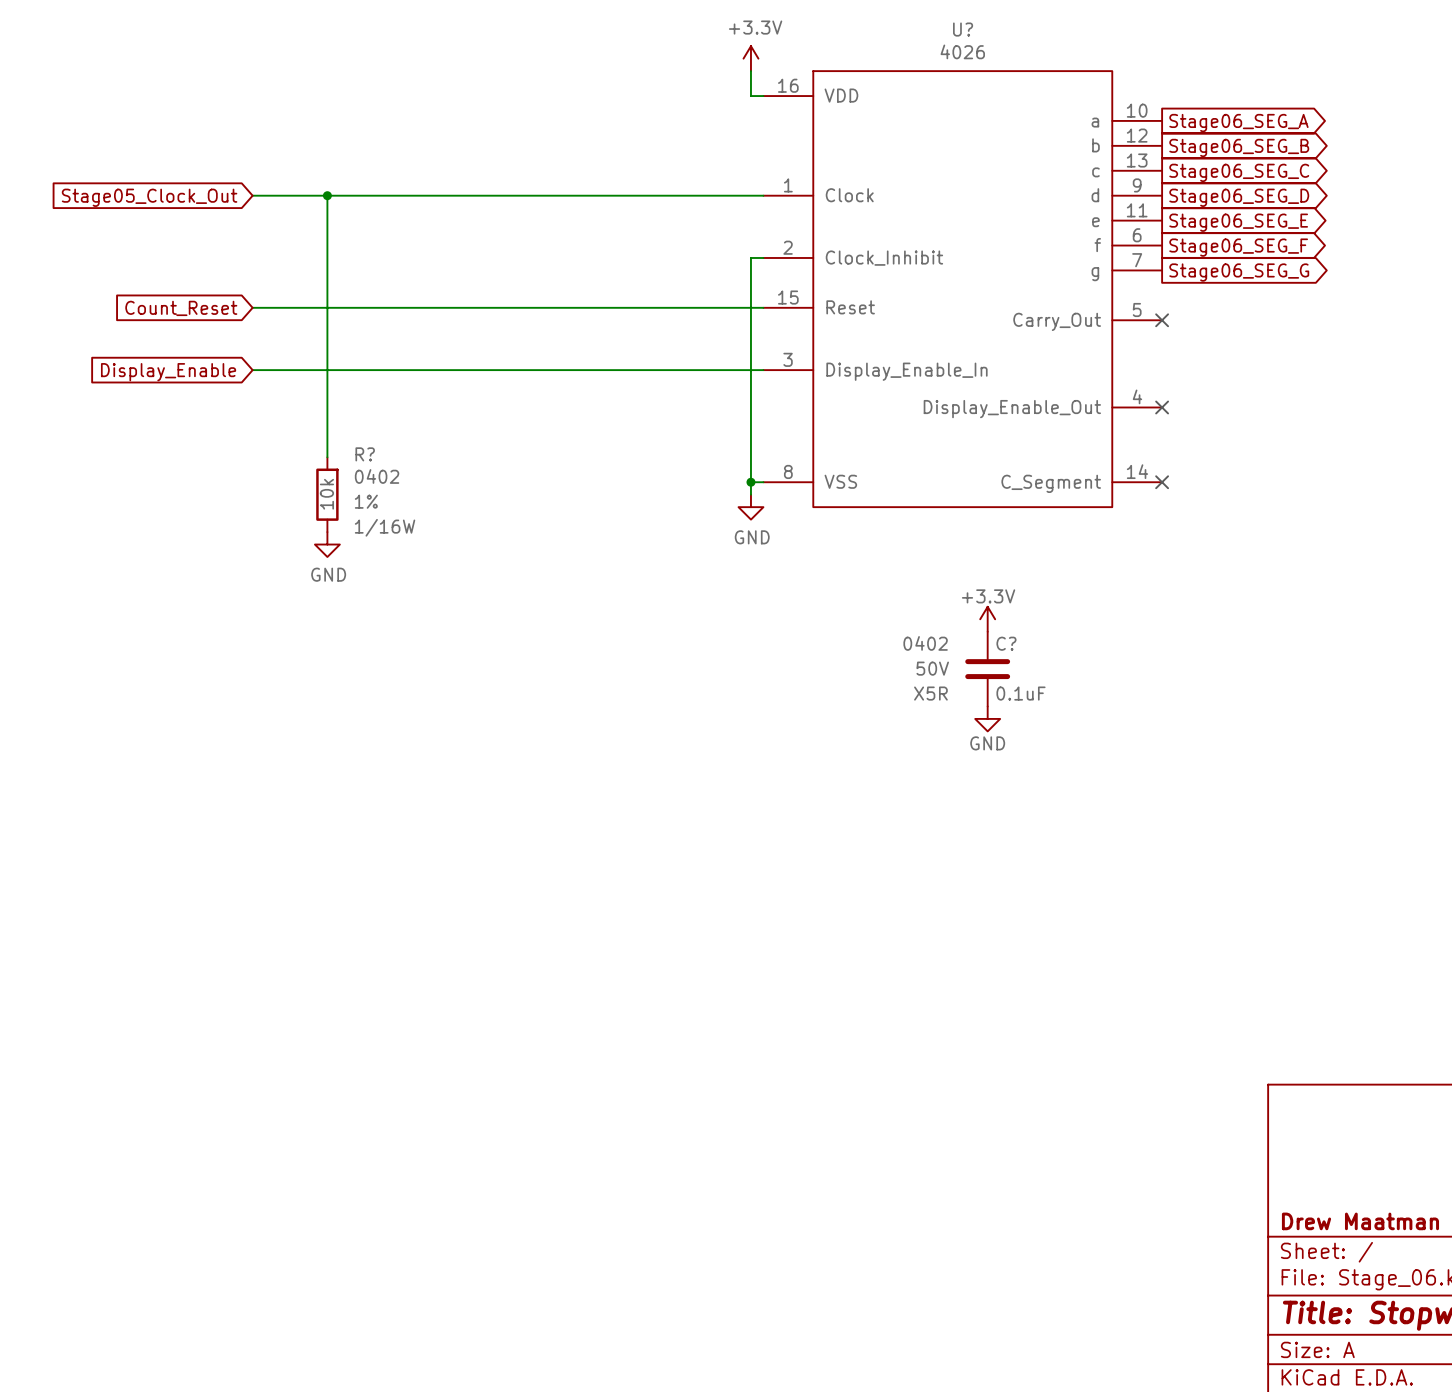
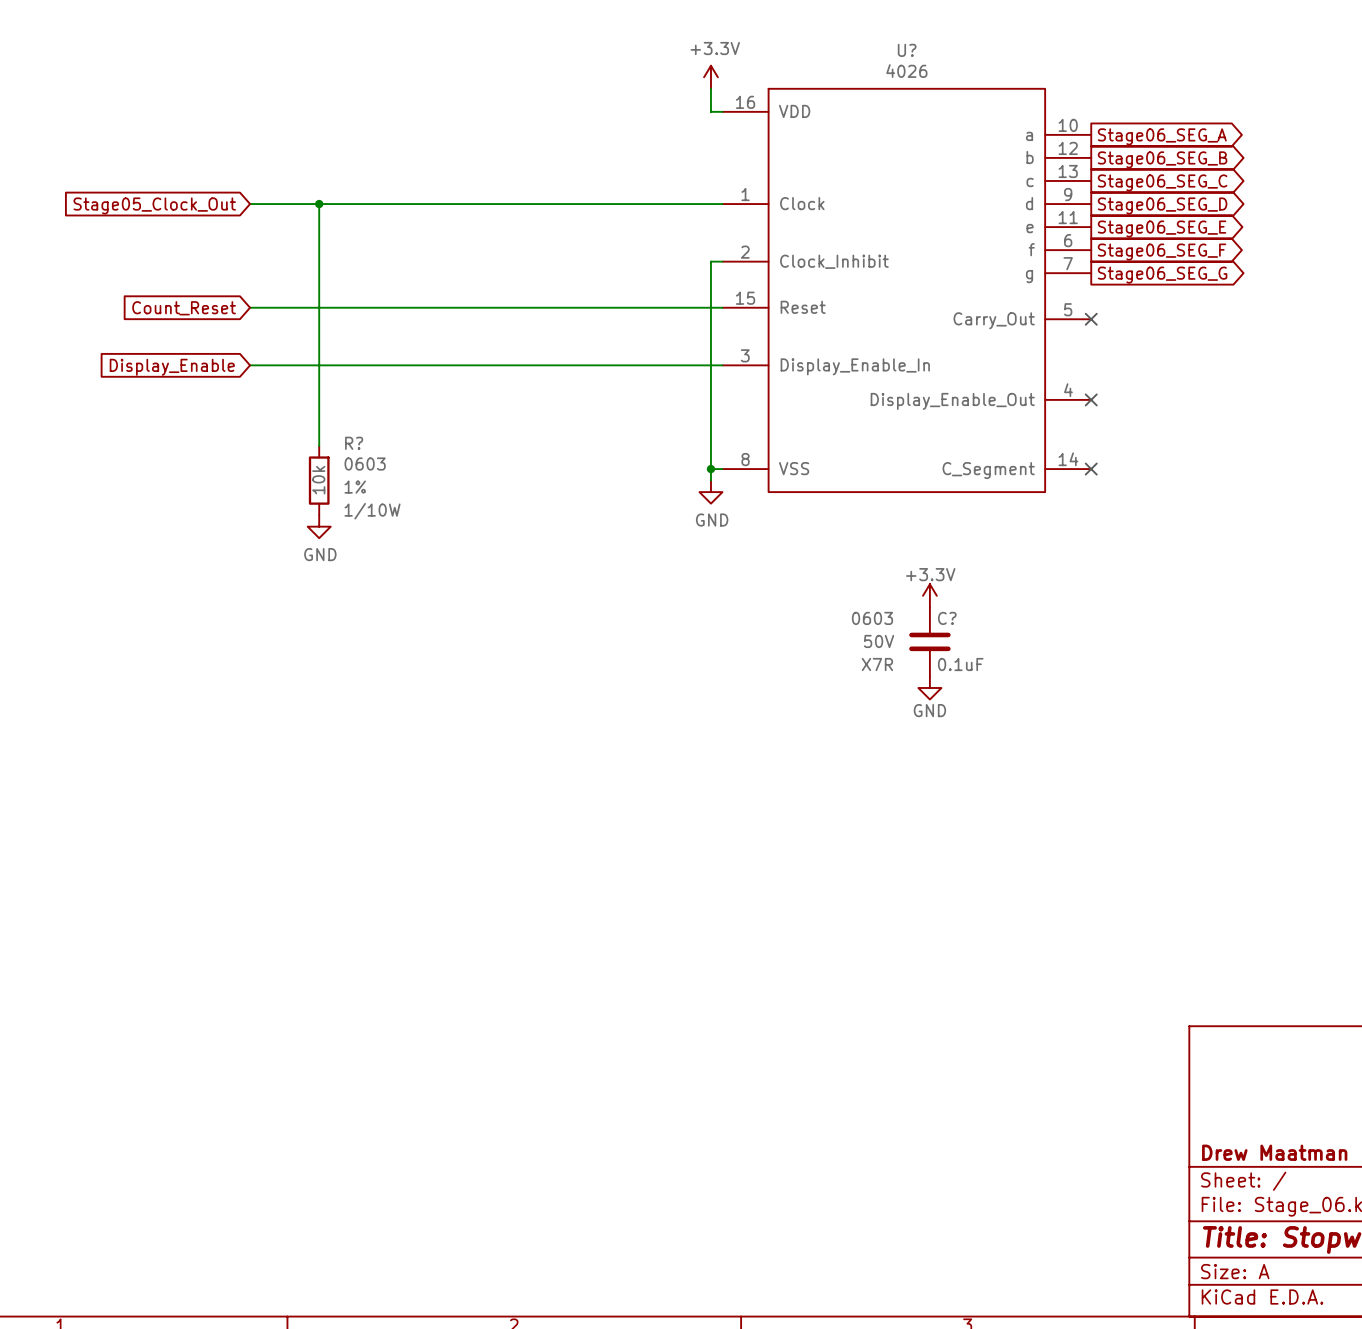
R? text: 0402 (377, 476) -> 0603 (365, 464)
R? text: 1/16W (385, 527) -> 1/10W (372, 511)
C? text: 0402 (925, 643) -> 0603 (872, 618)
C? text: X5R (930, 693) -> X7R (877, 664)

